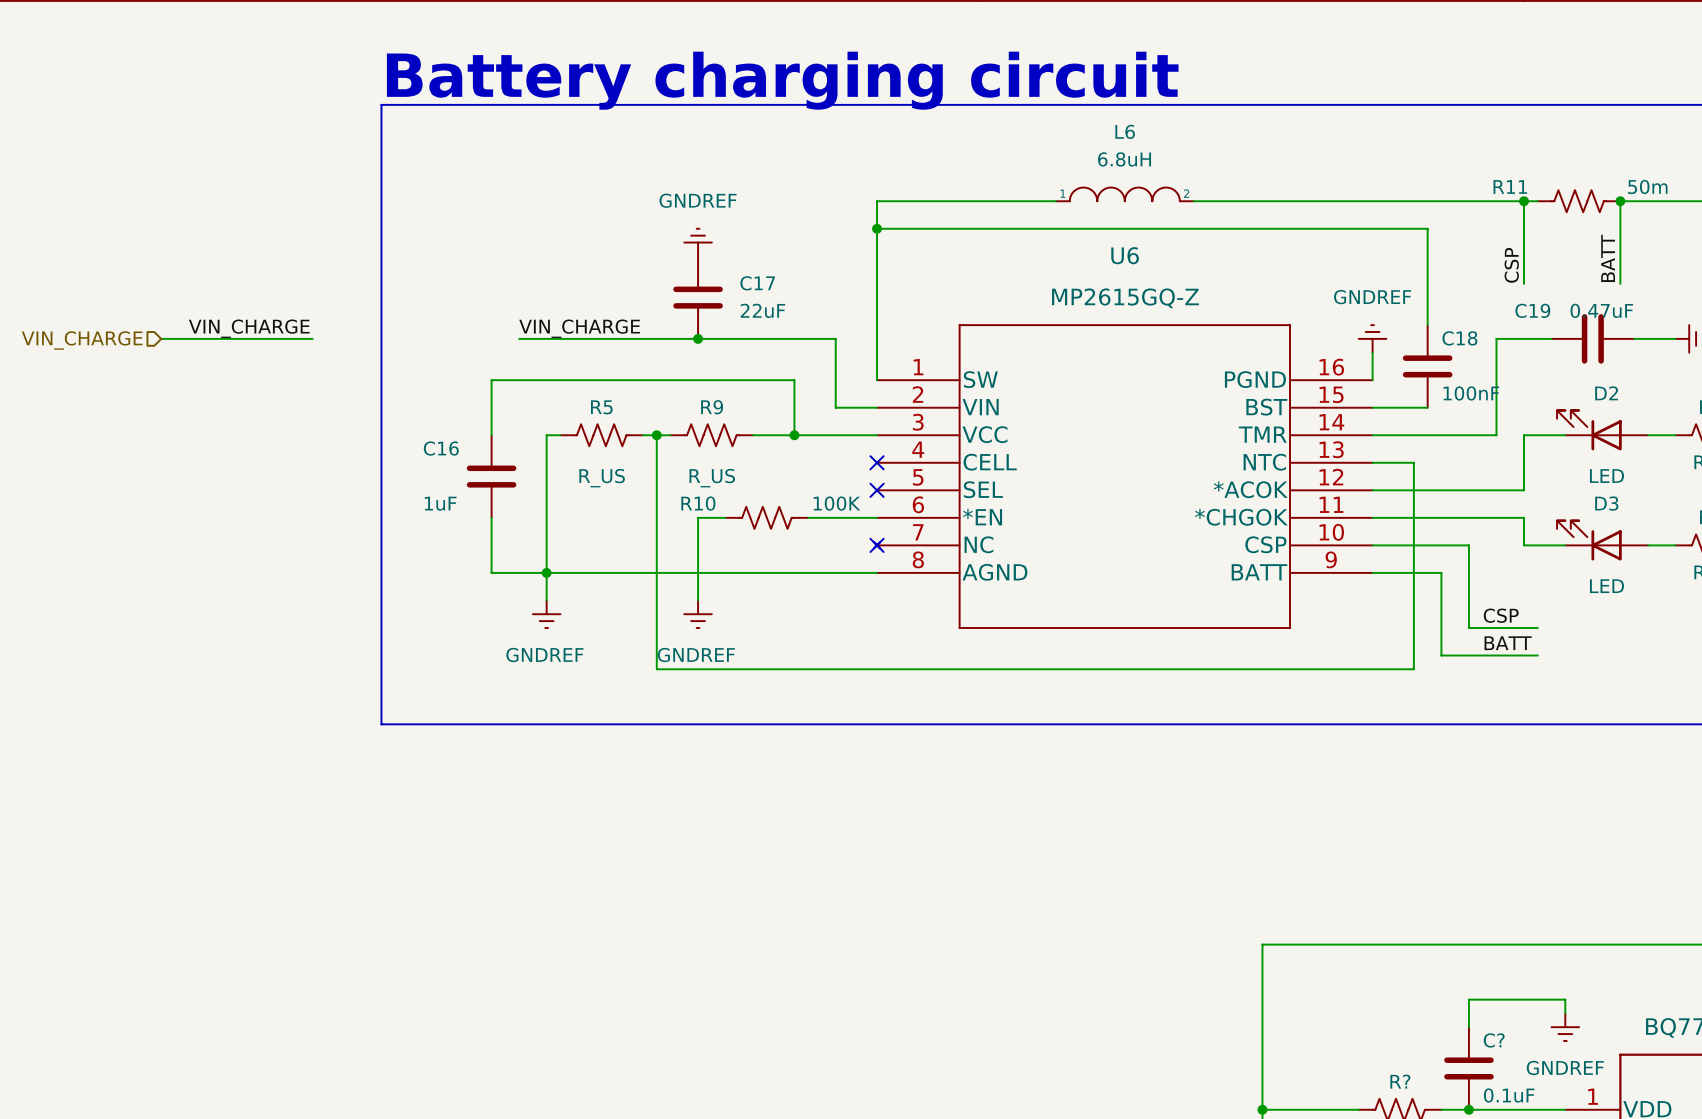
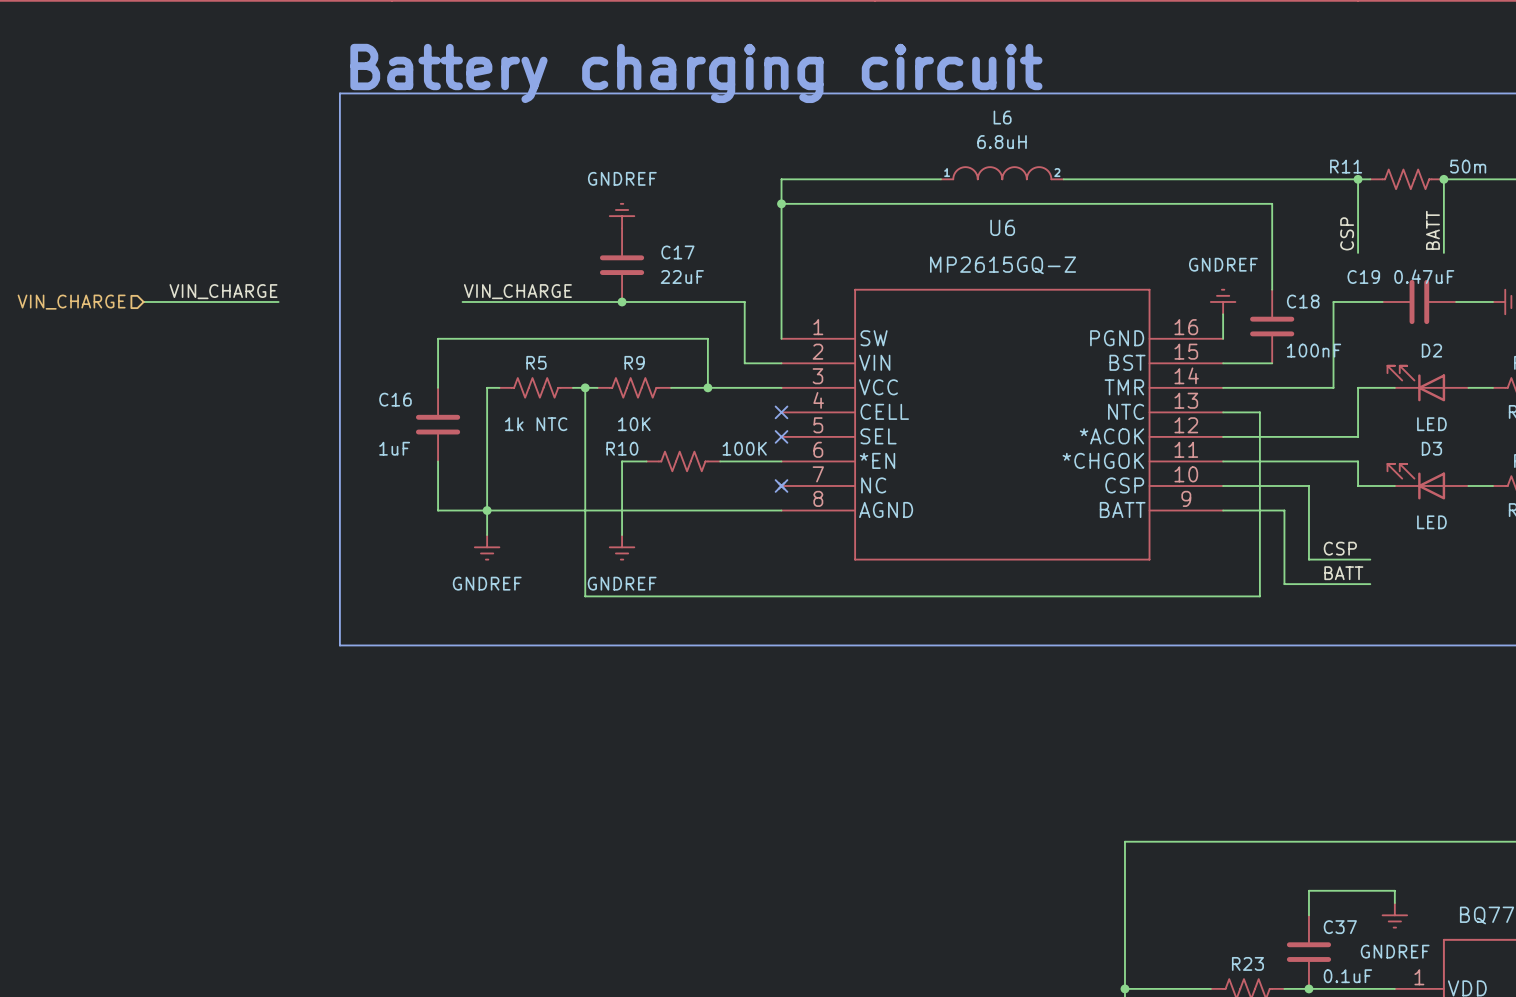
R5 value: R_US (602, 478) -> 1k NTC (536, 424)
R9 value: R_US (712, 478) -> 10K (634, 424)
C? name: C? (1494, 1040) -> C37 (1340, 927)
R? name: R? (1400, 1081) -> R23 (1247, 963)

